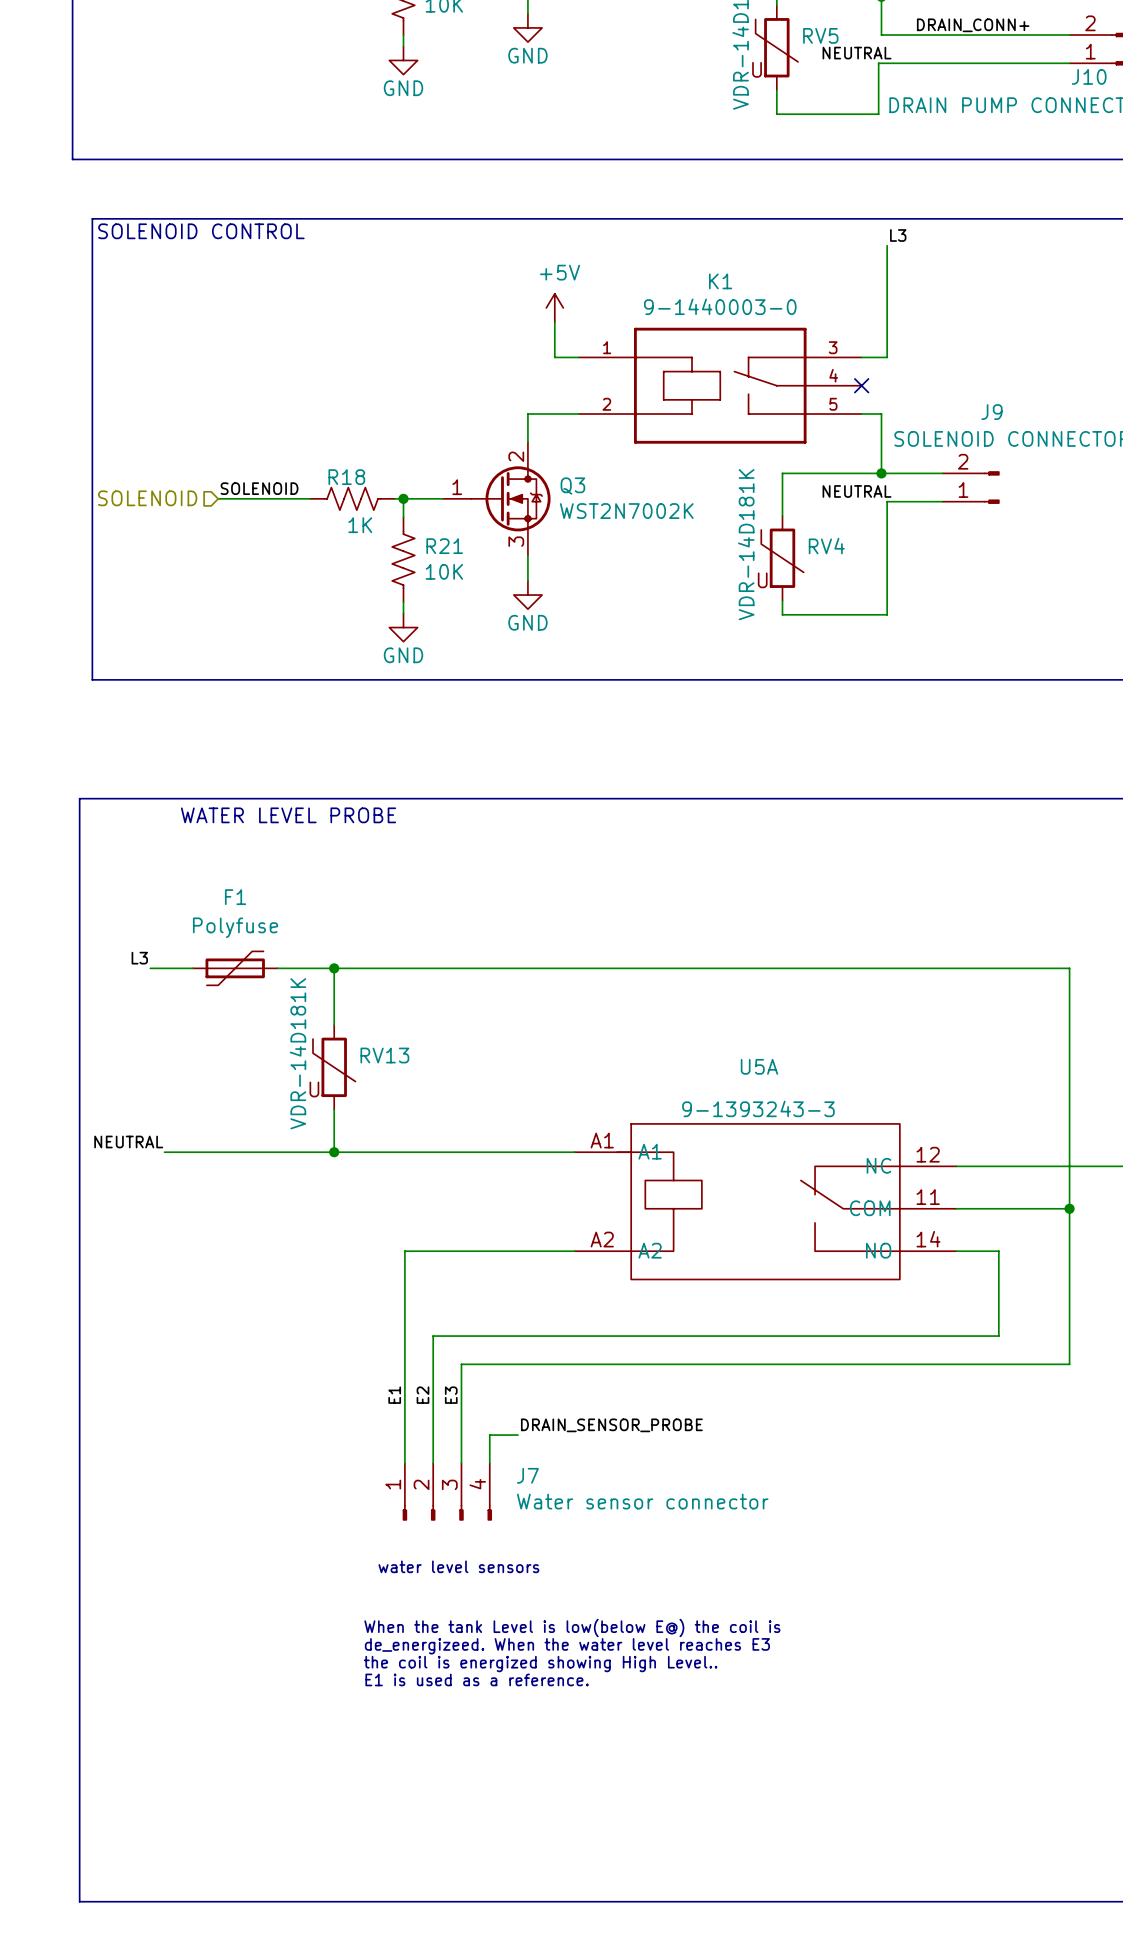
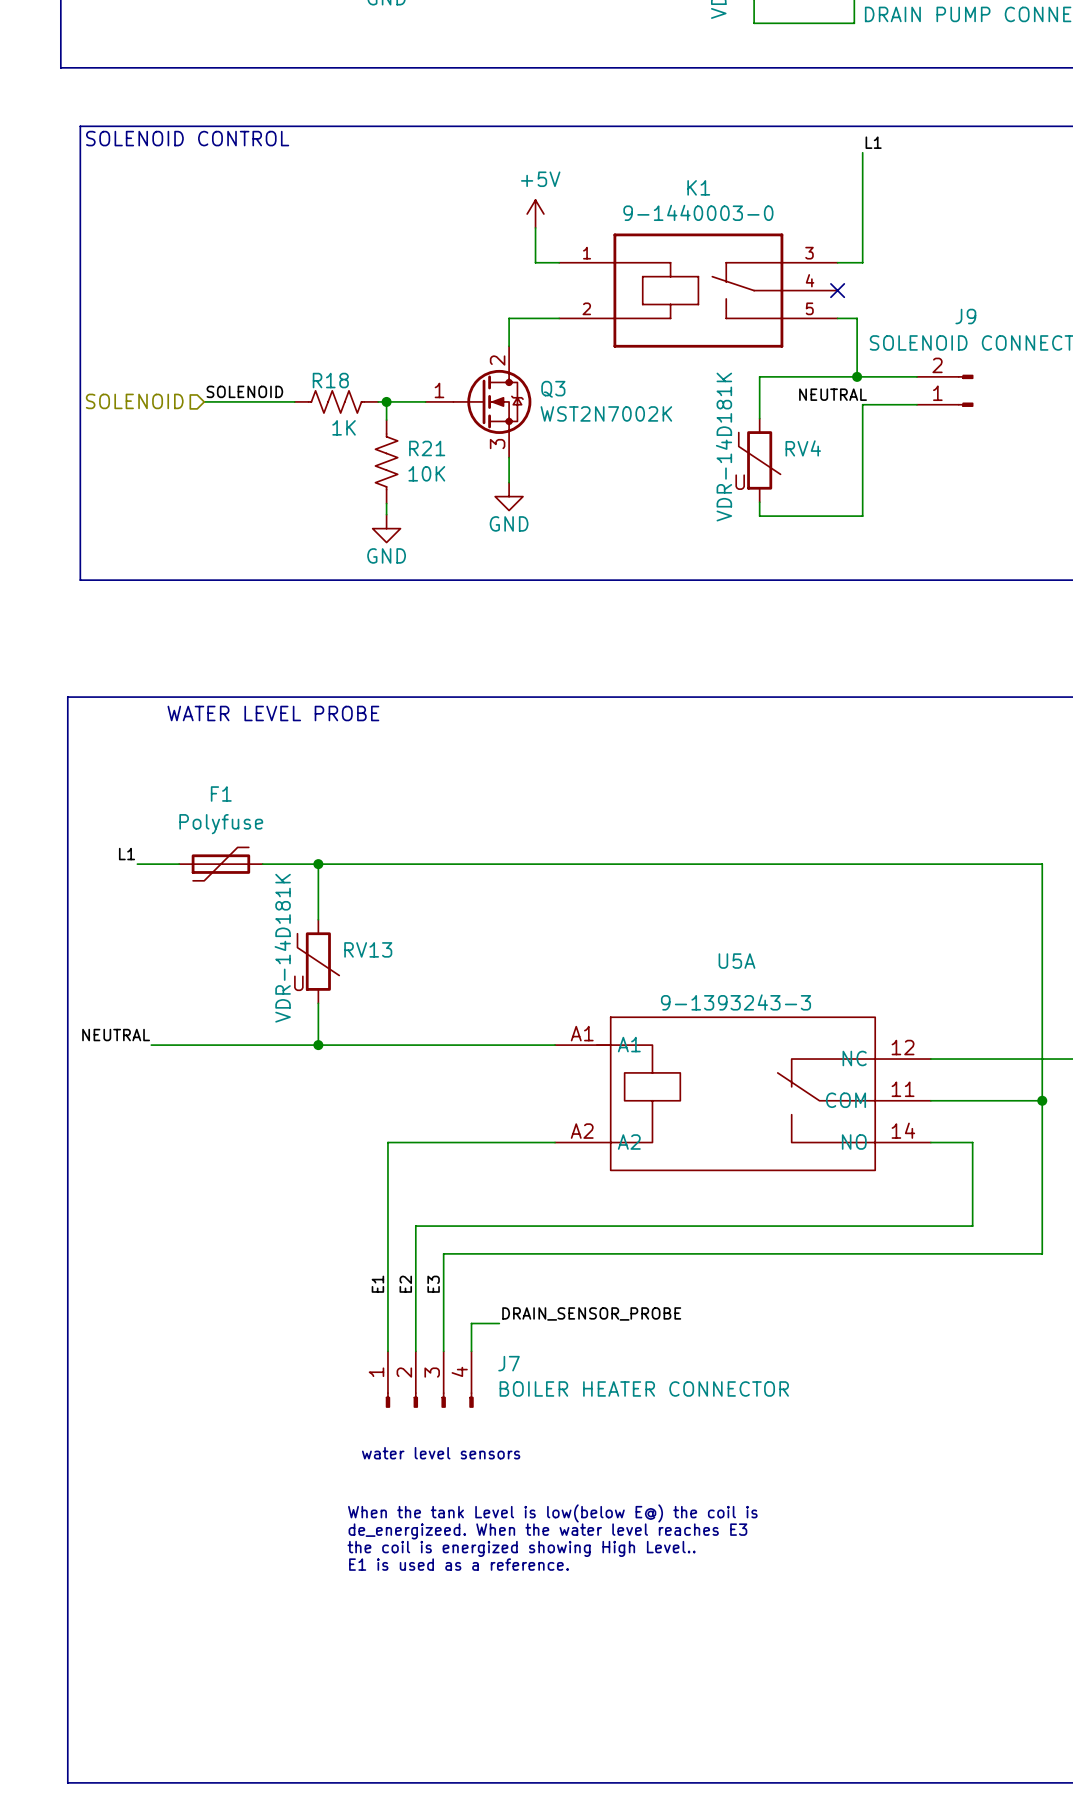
label: L3 (898, 235) -> L1 (873, 142)
label: L3 (139, 958) -> L1 (126, 854)
J7 value: Water sensor connector (642, 1501) -> BOILER HEATER CONNECTOR (644, 1388)

